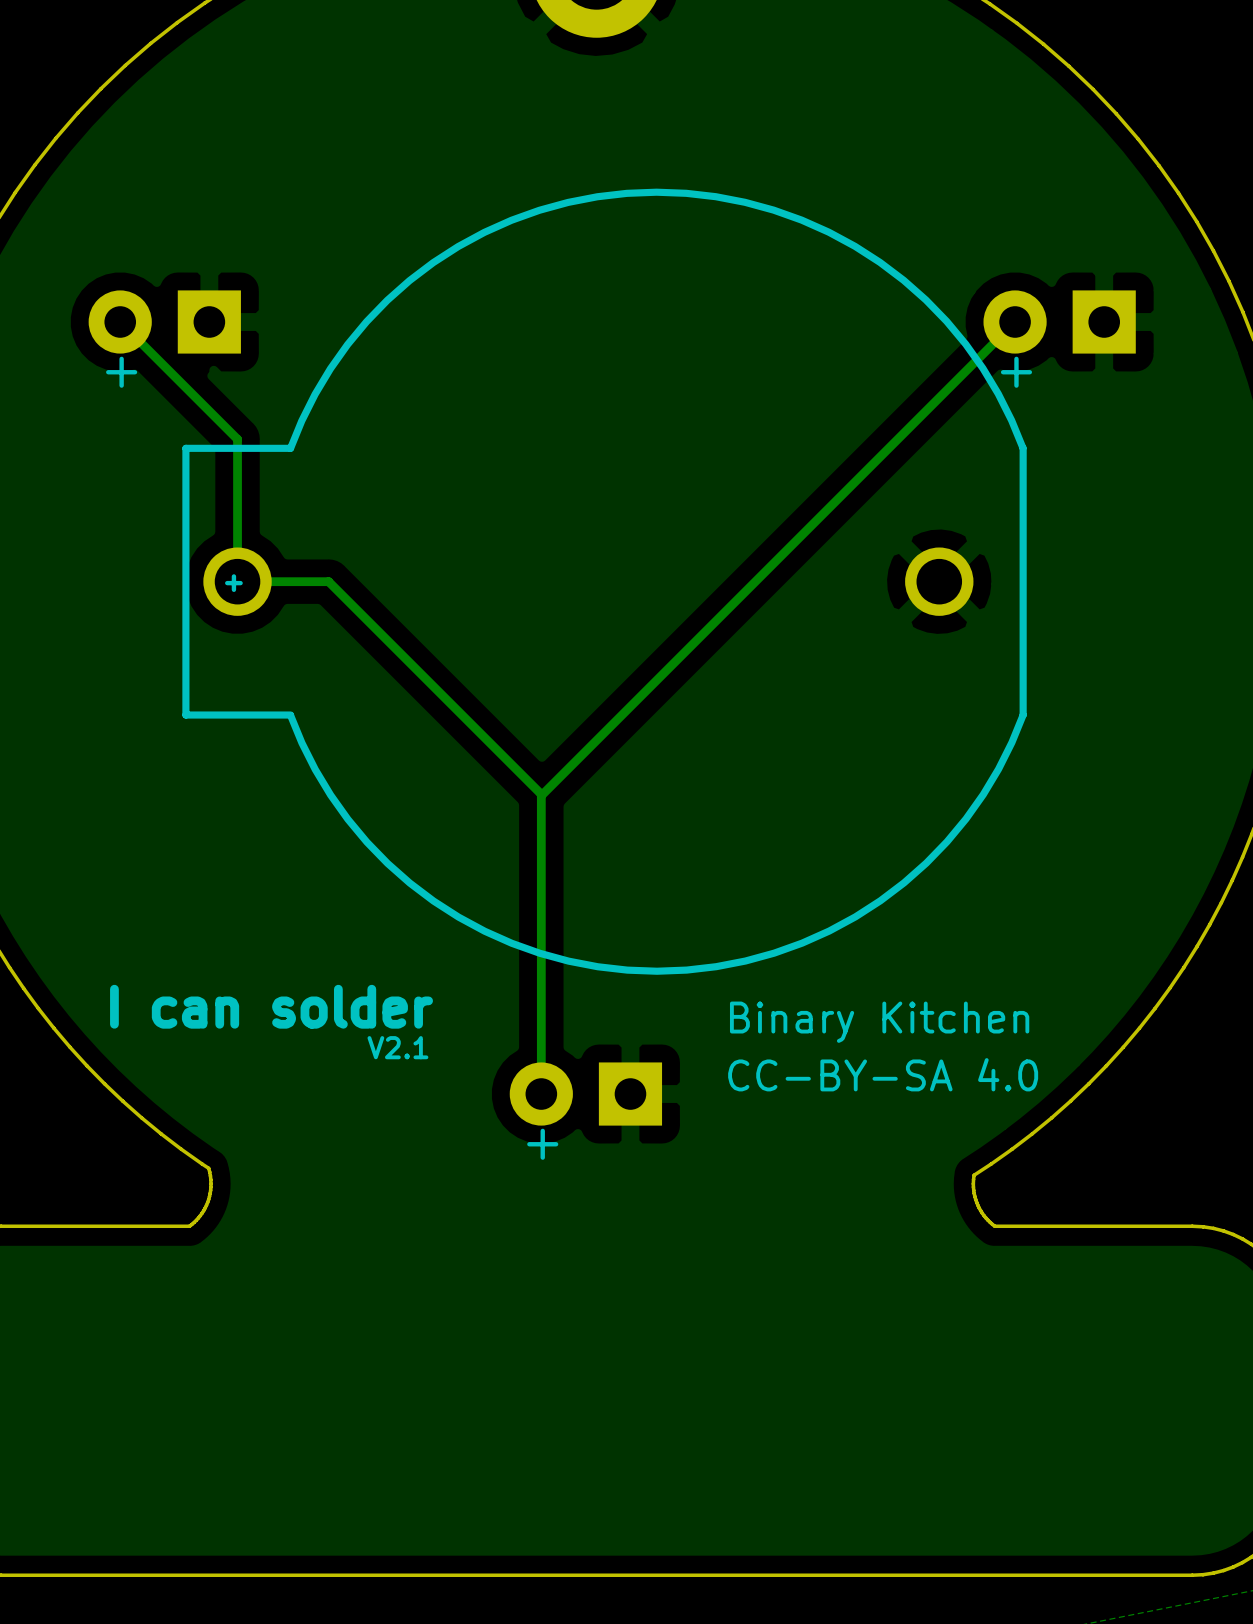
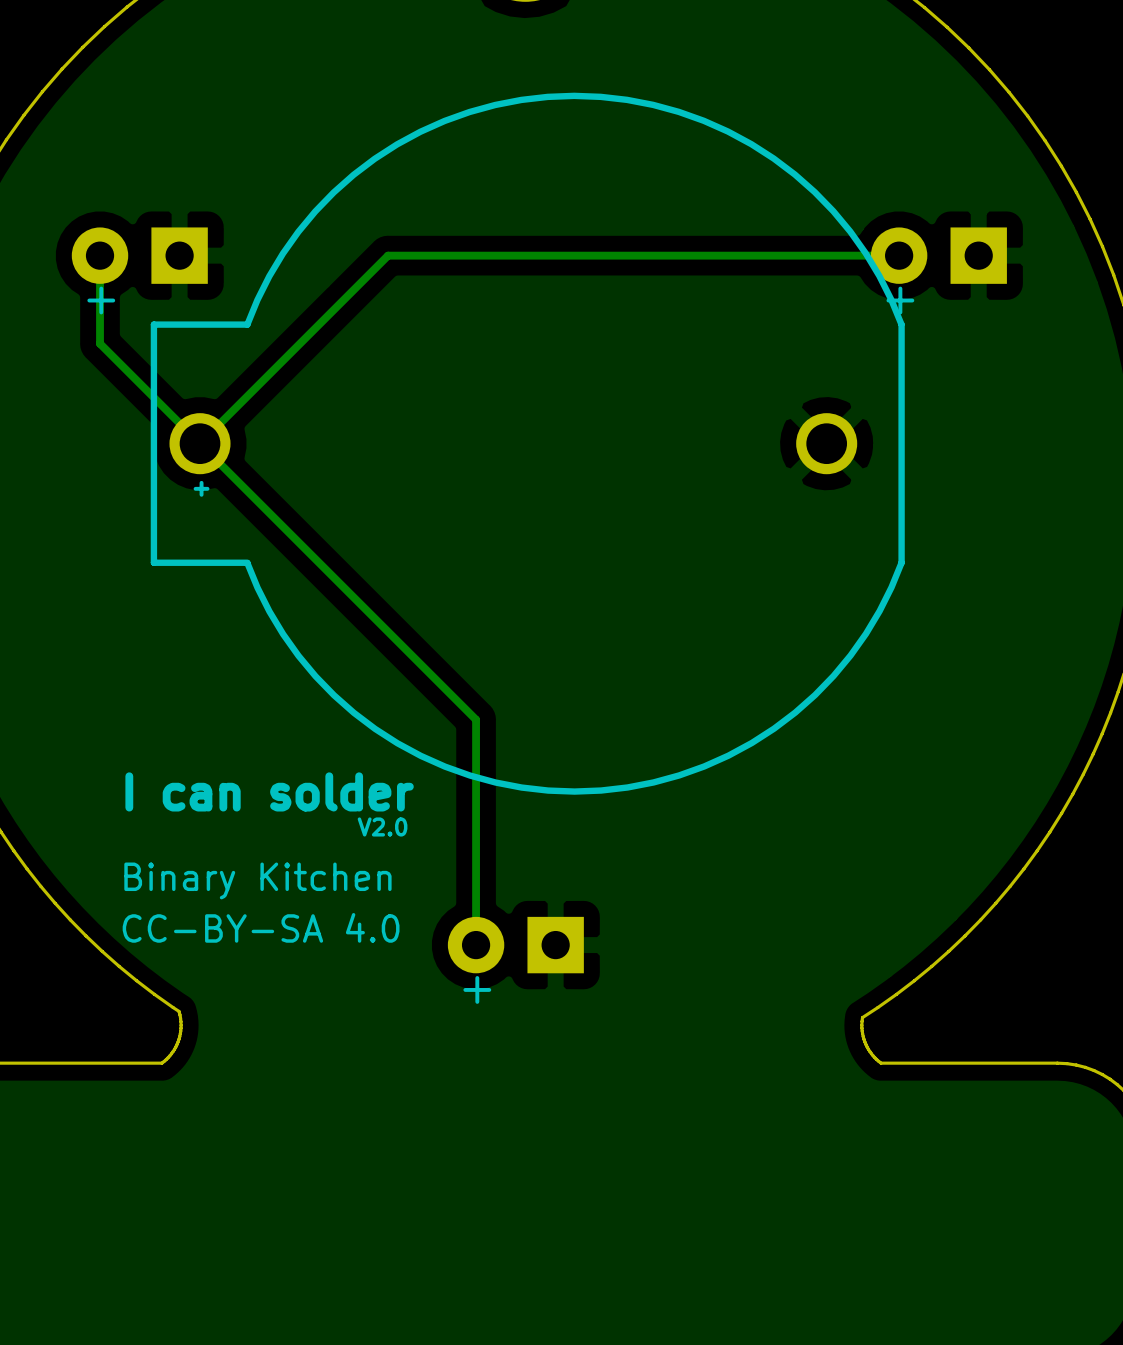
track: (120, 321) (237, 439) (237, 581) (328, 581) (541, 794) (541, 841) -> (100, 255) (100, 343) (476, 719)
track: (1015, 321) (541, 795) -> (899, 255) (388, 255) (200, 443)
part position: (604, 581) -> (527, 443)
text: none -> V2.0 (382, 826)
text position: I can solder (271, 1006) -> I can solder (269, 791)
text position: Binary Kitchen (879, 1022) -> Binary Kitchen (257, 880)
text: V2.1 (397, 1047) -> none
text position: CC-BY-SA 4.0 (883, 1074) -> CC-BY-SA 4.0 (261, 927)

